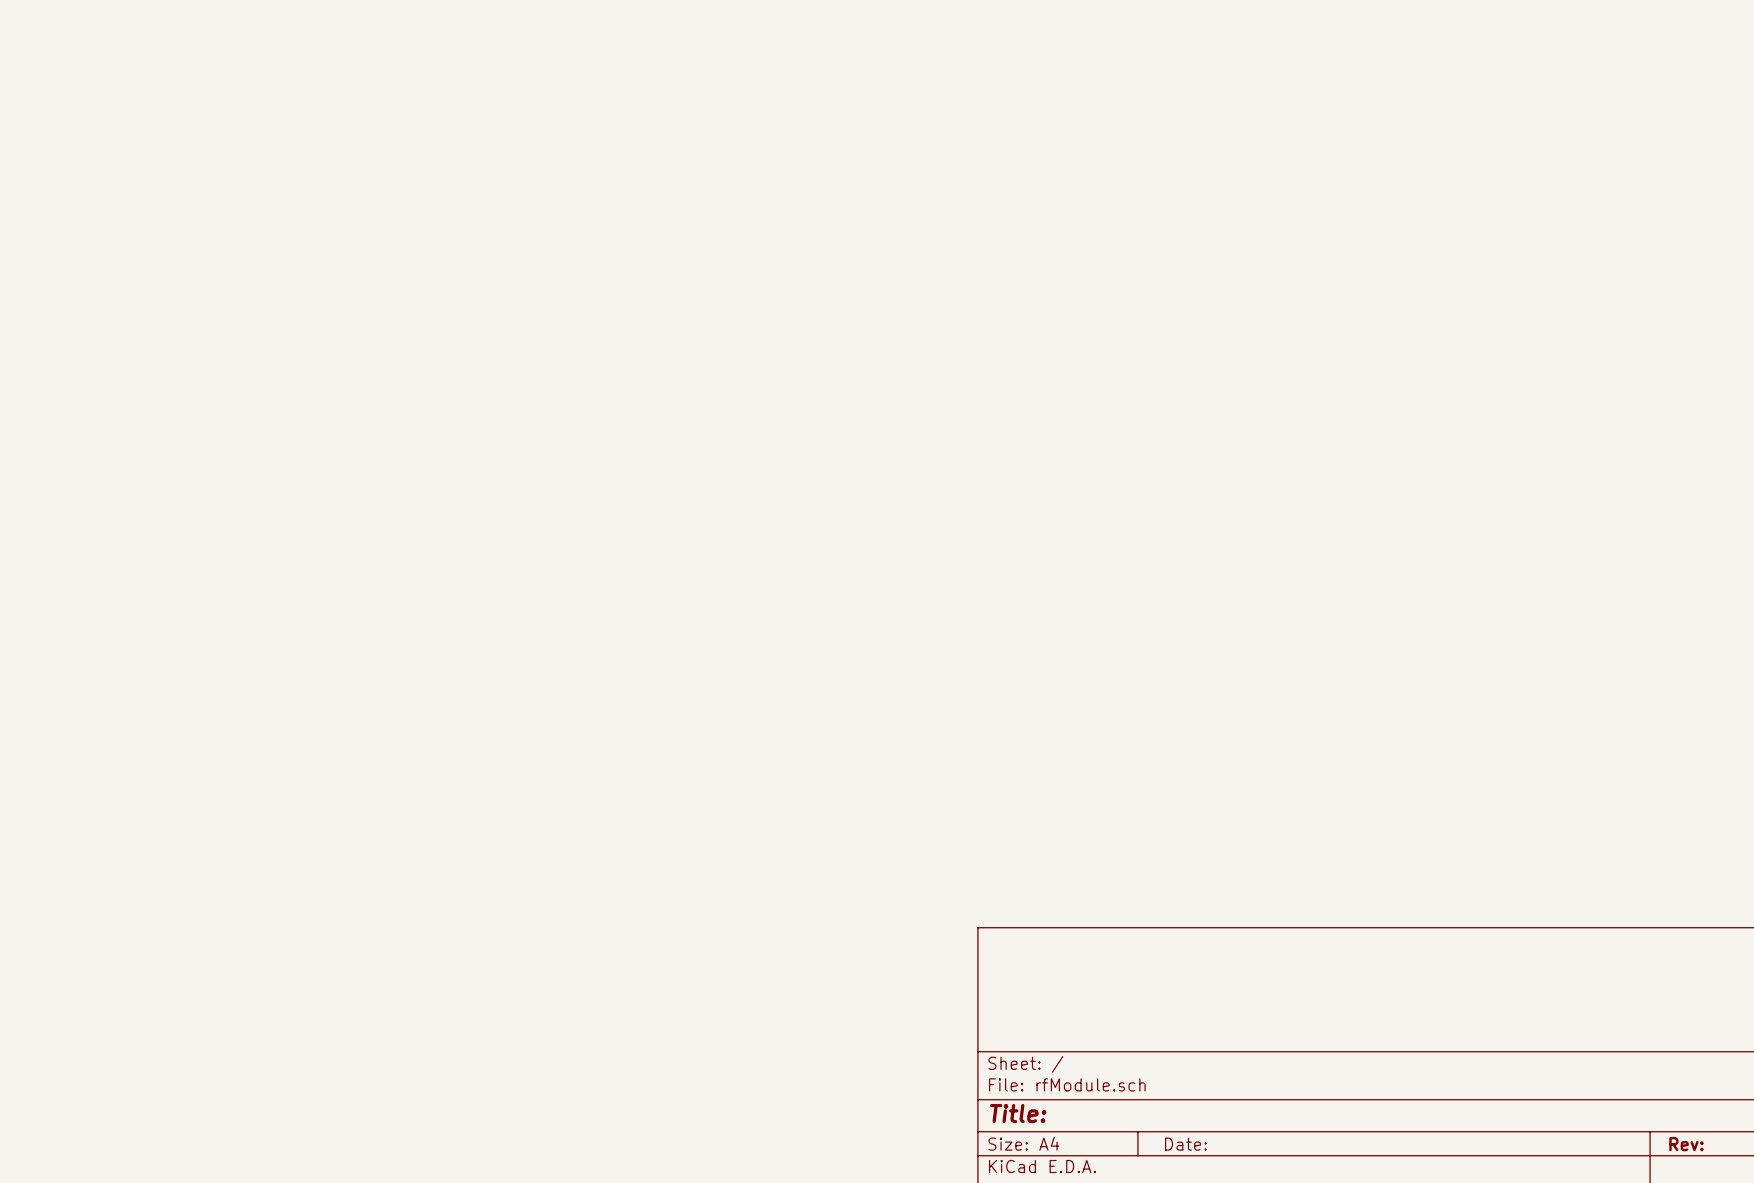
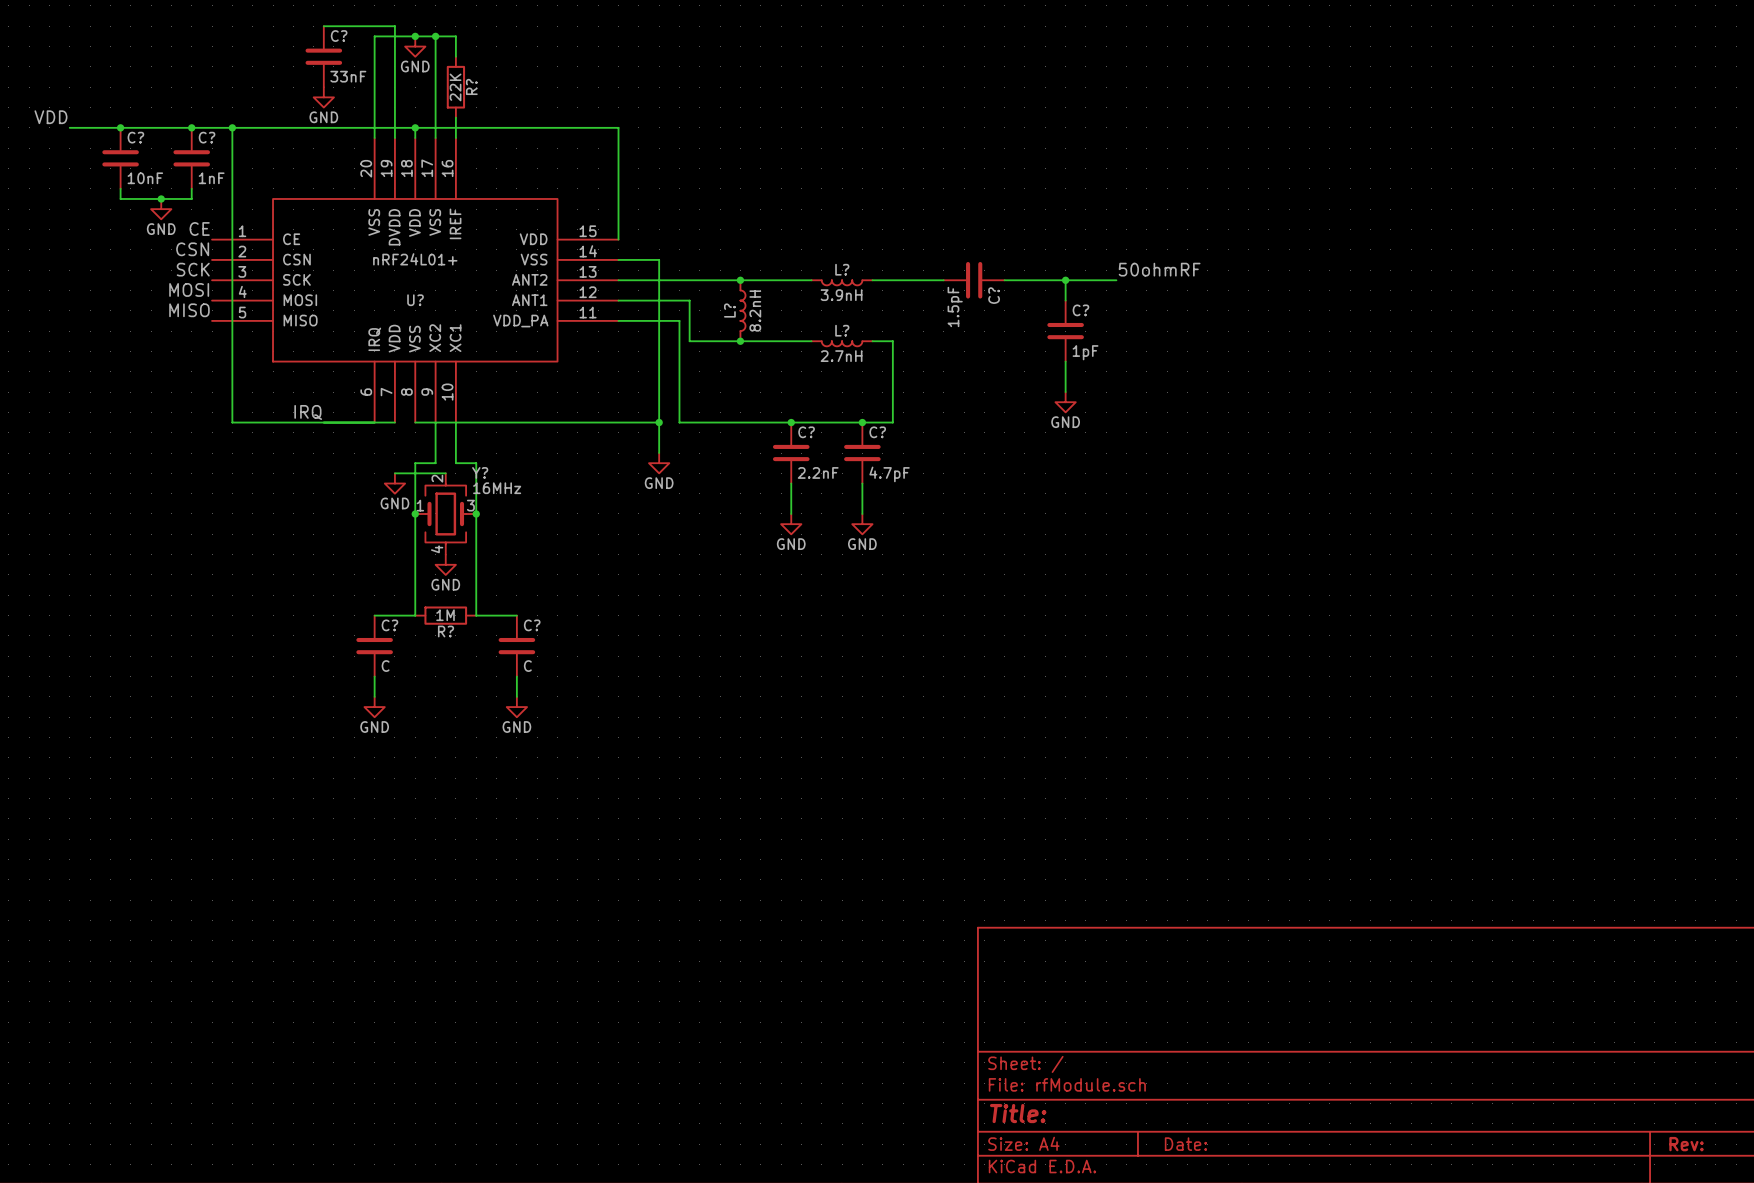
wire: none -> (323, 26) (394, 26) (394, 138)
junction: none -> (415, 36)
wire: none -> (435, 36) (435, 138)
junction: none -> (435, 36)
power symbol: none -> GND (415, 46)
C?: none -> 33nF (323, 56)
wire: none -> (455, 56) (455, 36) (374, 36) (374, 138)
R?: none -> 22K (455, 87)
power symbol: none -> GND (323, 97)
label: none -> VDD (50, 117)
wire: none -> (455, 117) (455, 138)
wire: none -> (69, 127) (618, 127) (618, 239)
junction: none -> (120, 127)
junction: none -> (191, 127)
wire: none -> (232, 127) (232, 422) (394, 422)
junction: none -> (232, 127)
wire: none -> (415, 127) (415, 138)
junction: none -> (415, 127)
C?: none -> 10nF (120, 158)
C?: none -> 1nF (191, 158)
wire: none -> (120, 188) (120, 198) (191, 198) (191, 188)
junction: none -> (161, 198)
power symbol: none -> GND (161, 209)
label: none -> CE (199, 228)
label: none -> CSN (192, 249)
wire: none -> (618, 259) (659, 259) (659, 453)
label: none -> SCK (193, 269)
label: none -> 50ohmRF (1159, 269)
U?: none -> nRF24L01+ (415, 280)
wire: none -> (618, 280) (811, 280)
junction: none -> (740, 280)
wire: none -> (872, 280) (943, 280)
C?: none -> 1.5pF (974, 280)
wire: none -> (1004, 280) (1116, 280)
wire: none -> (1065, 280) (1065, 300)
junction: none -> (1065, 280)
L?: none -> 3.9nH (842, 282)
label: none -> MOSI (189, 289)
wire: none -> (618, 300) (689, 300) (689, 341) (811, 341)
label: none -> MISO (189, 310)
L?: none -> 8.2nH (742, 310)
wire: none -> (618, 320) (679, 320) (679, 422) (892, 422) (892, 341) (872, 341)
C?: none -> 1pF (1065, 331)
junction: none -> (740, 341)
L?: none -> 2.7nH (842, 343)
wire: none -> (1065, 361) (1065, 392)
power symbol: none -> GND (1065, 402)
label: none -> IRQ (308, 412)
wire: none -> (415, 422) (659, 422)
wire: none -> (435, 422) (435, 463) (415, 463) (415, 615) (374, 615)
wire: none -> (455, 422) (455, 463) (476, 463) (476, 615) (516, 615)
junction: none -> (659, 422)
junction: none -> (791, 422)
junction: none -> (862, 422)
C?: none -> 2.2nF (791, 453)
C?: none -> 4.7pF (862, 453)
power symbol: none -> GND (659, 463)
wire: none -> (394, 473) (445, 473)
power symbol: none -> GND (394, 483)
wire: none -> (791, 483) (791, 513)
wire: none -> (862, 483) (862, 513)
junction: none -> (415, 513)
Y?: none -> 16MHz (445, 513)
junction: none -> (476, 513)
power symbol: none -> GND (791, 524)
power symbol: none -> GND (862, 524)
power symbol: none -> GND (445, 564)
R?: none -> 1M (445, 615)
C?: none -> C (374, 646)
C?: none -> C (516, 646)
wire: none -> (374, 676) (374, 696)
wire: none -> (516, 676) (516, 696)
power symbol: none -> GND (374, 707)
power symbol: none -> GND (516, 707)

